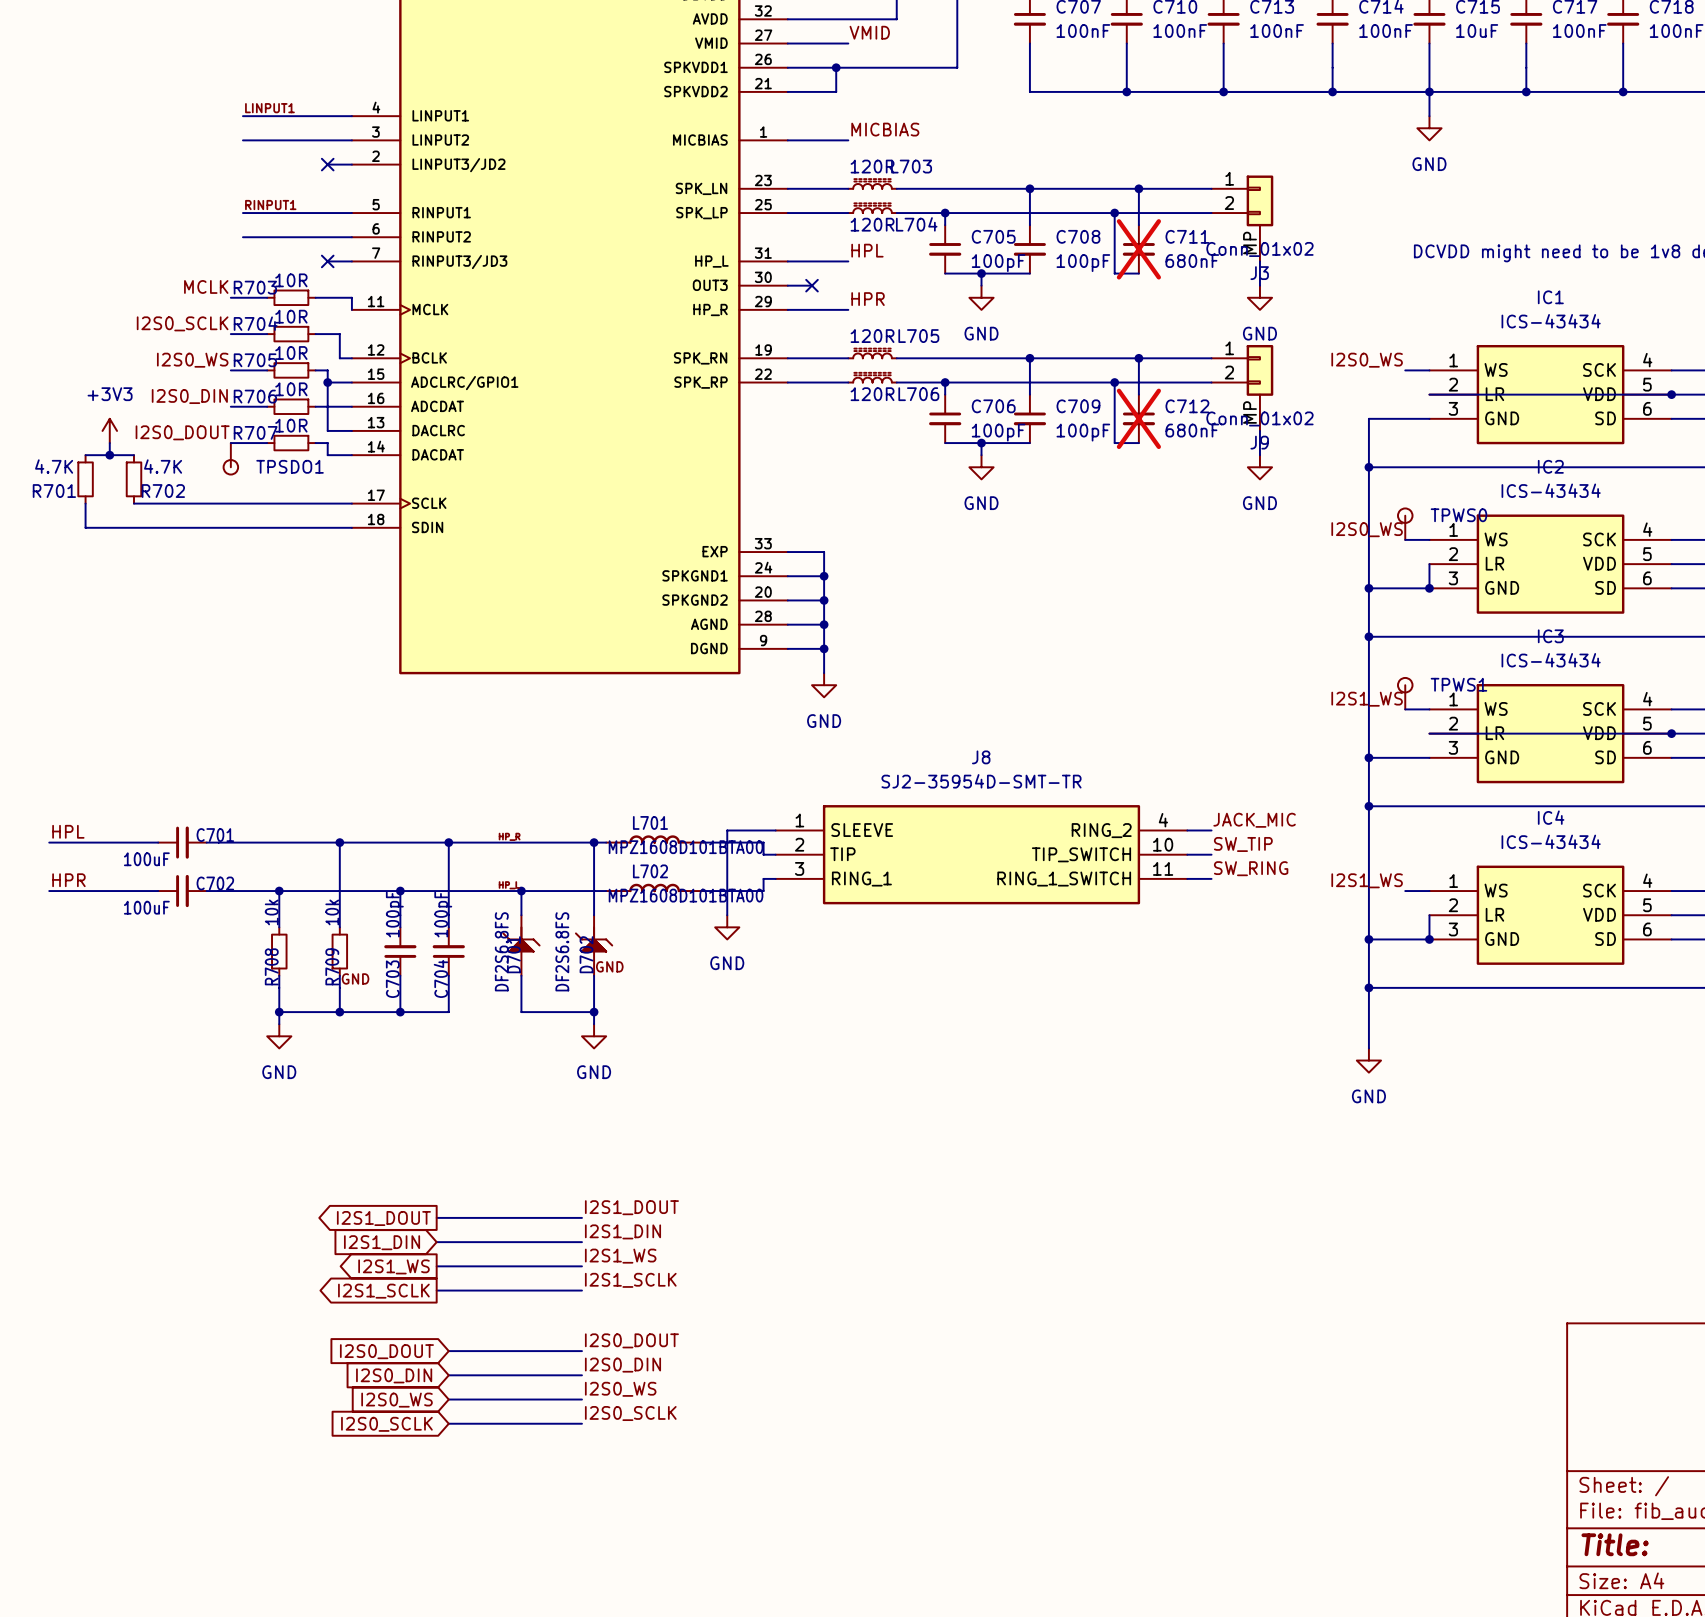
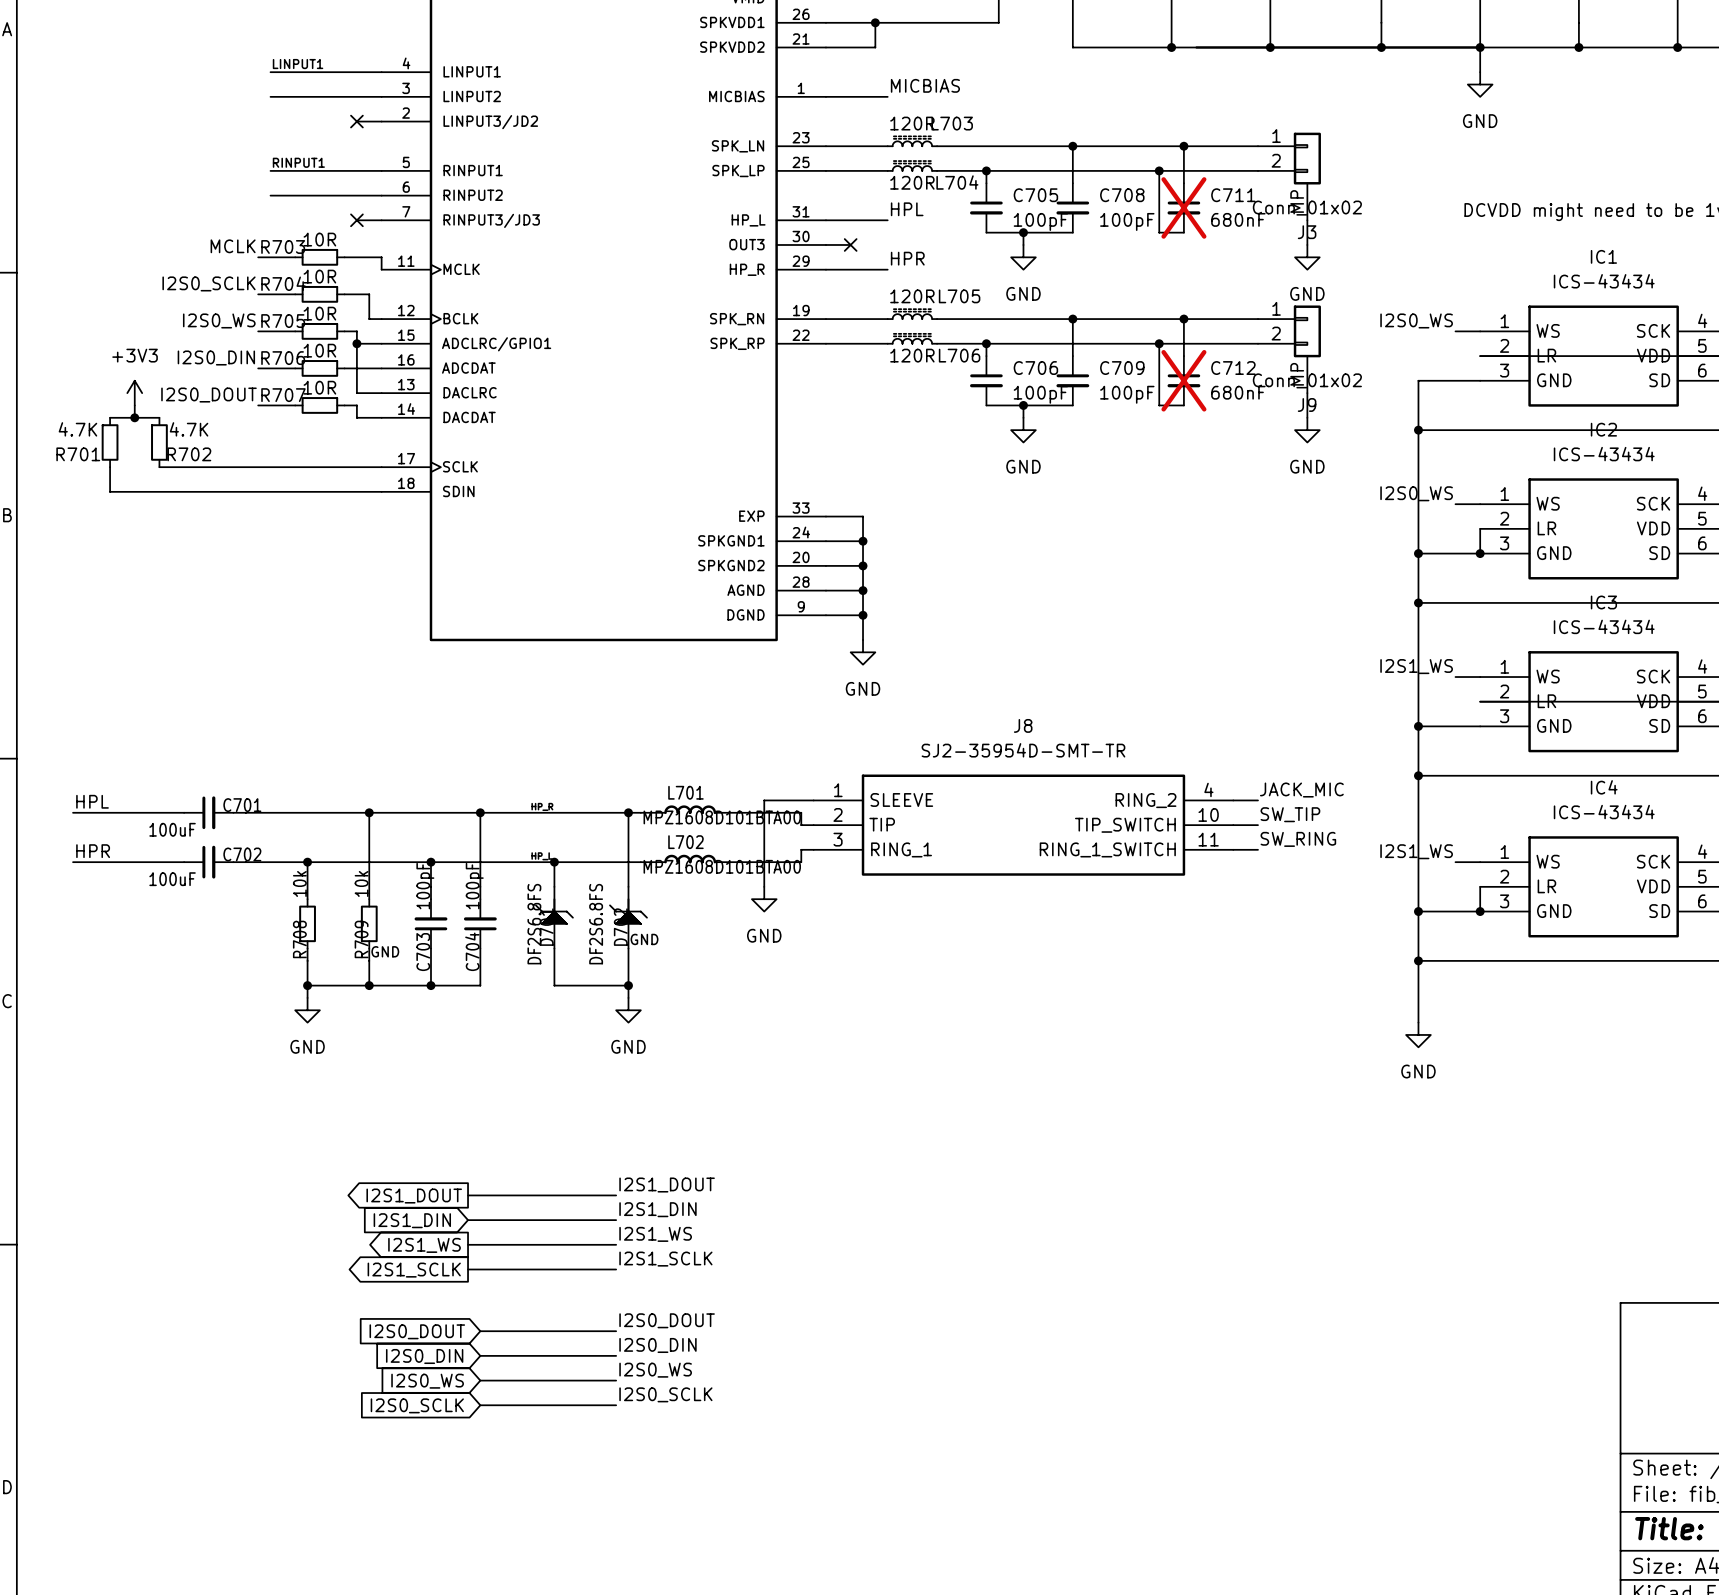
TPSDO1: (230, 458) -> none
TPWS0: (1405, 524) -> none
TPWS1: (1405, 693) -> none

